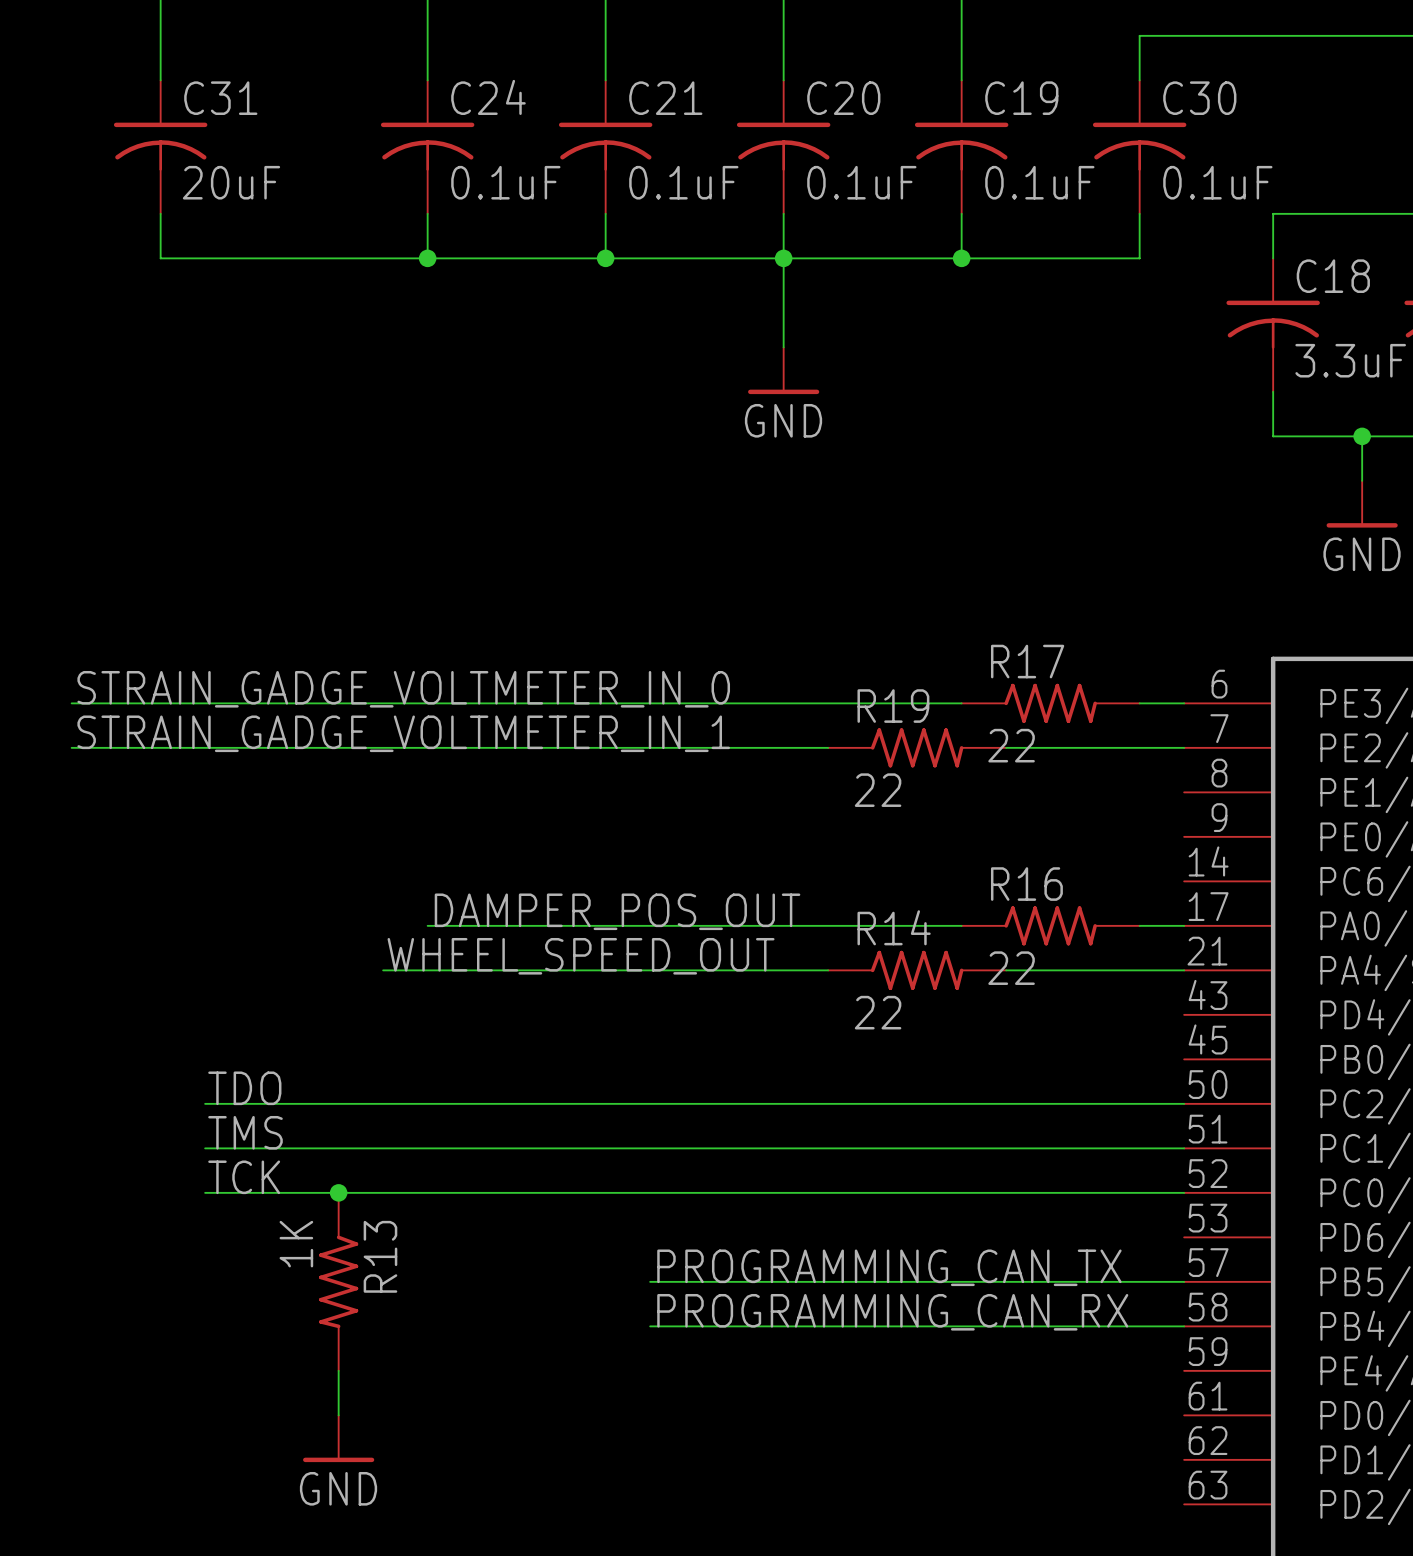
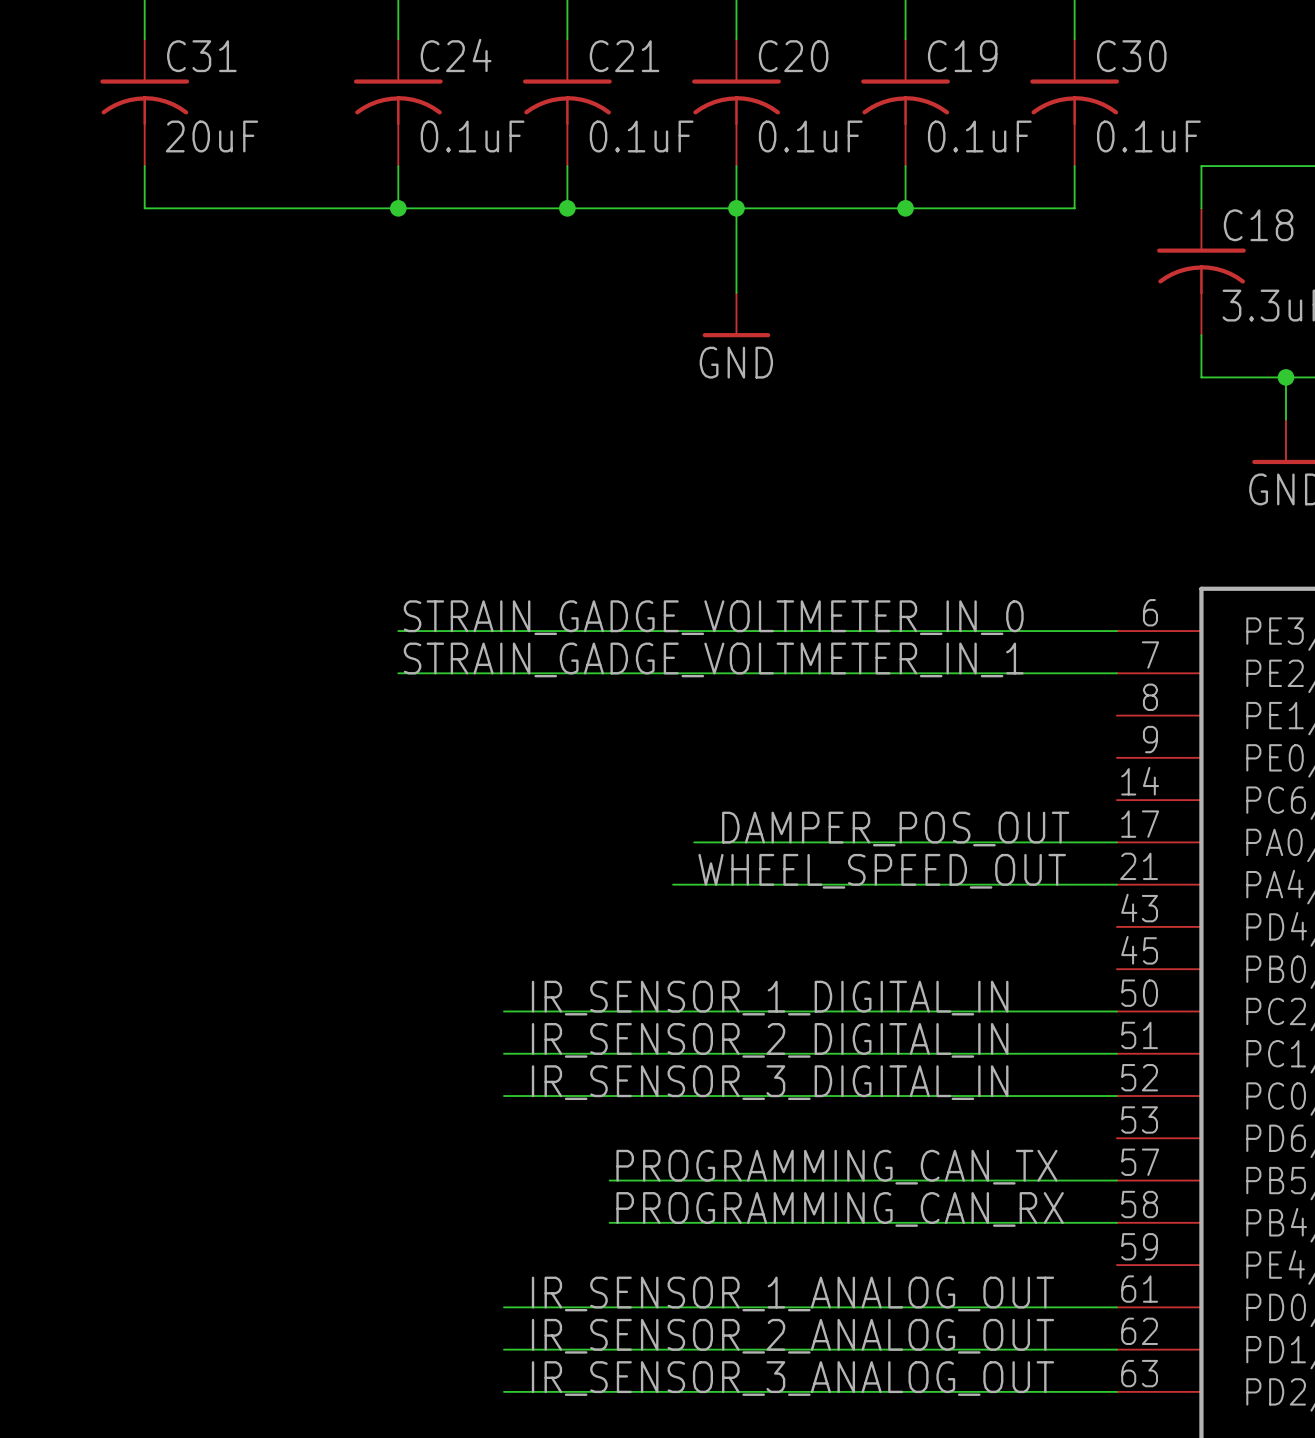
label position: STRAIN_GADGE_VOLTMETER_IN_0 (403, 689) -> STRAIN_GADGE_VOLTMETER_IN_0 (713, 617)
wire: (71, 703) (427, 703) -> none
R17: 22 (1050, 703) -> none
label position: STRAIN_GADGE_VOLTMETER_IN_1 (403, 733) -> STRAIN_GADGE_VOLTMETER_IN_1 (713, 659)
wire: (71, 747) (427, 747) -> none
R19: 22 (917, 747) -> none
label position: DAMPER_POS_OUT (617, 911) -> DAMPER_POS_OUT (895, 829)
wire: (427, 925) (739, 925) -> none
R16: 22 (1050, 925) -> none
label position: WHEEL_SPEED_OUT (581, 956) -> WHEEL_SPEED_OUT (882, 871)
wire: (383, 970) (716, 970) -> none
R14: 22 (917, 970) -> none
label: TDO (244, 1088) -> none
label: none -> IR_SENSOR_1_DIGITAL_IN (770, 998)
wire: (205, 1103) (538, 1103) -> none
label: TMS (245, 1132) -> none
label: none -> IR_SENSOR_2_DIGITAL_IN (770, 1040)
wire: (205, 1148) (538, 1148) -> none
label: TCK (244, 1177) -> none
label: none -> IR_SENSOR_3_DIGITAL_IN (770, 1082)
wire: (205, 1192) (538, 1192) -> none
junction: (338, 1192) -> none
R13: 1K (338, 1281) -> none
wire: (338, 1370) (338, 1415) -> none
label: none -> IR_SENSOR_1_ANALOG_OUT (792, 1293)
wire: none -> (503, 1307) (1116, 1307)
power symbol: GND (338, 1438) -> none
label: none -> IR_SENSOR_2_ANALOG_OUT (792, 1336)
wire: none -> (503, 1349) (1116, 1349)
label: none -> IR_SENSOR_3_ANALOG_OUT (792, 1378)
wire: none -> (503, 1391) (1116, 1391)

